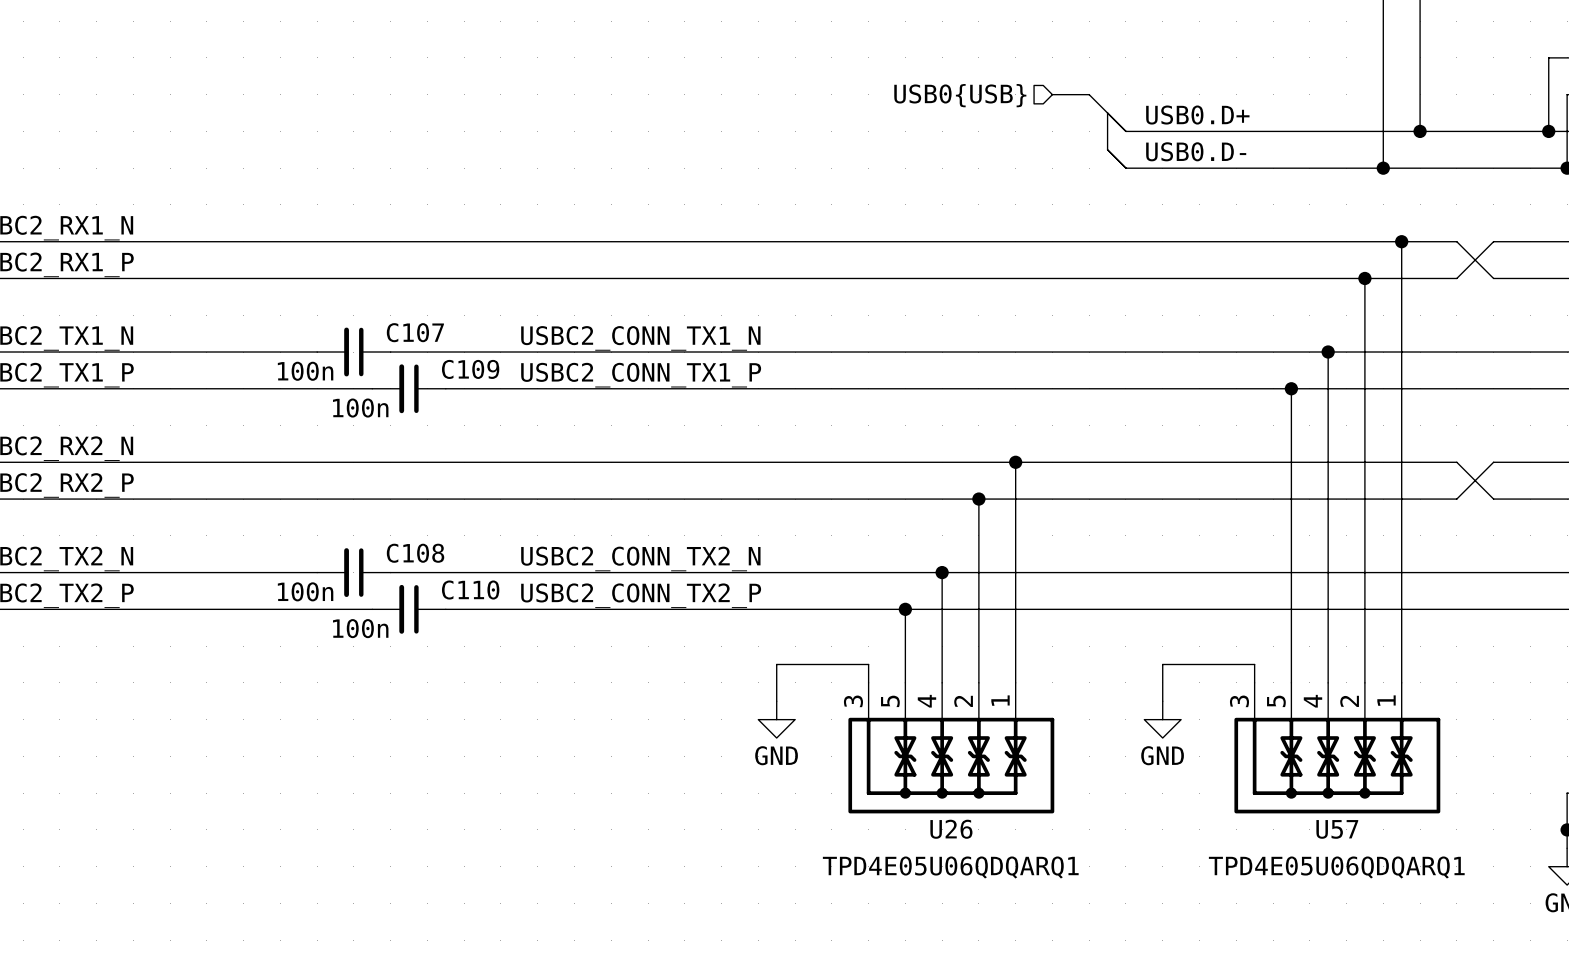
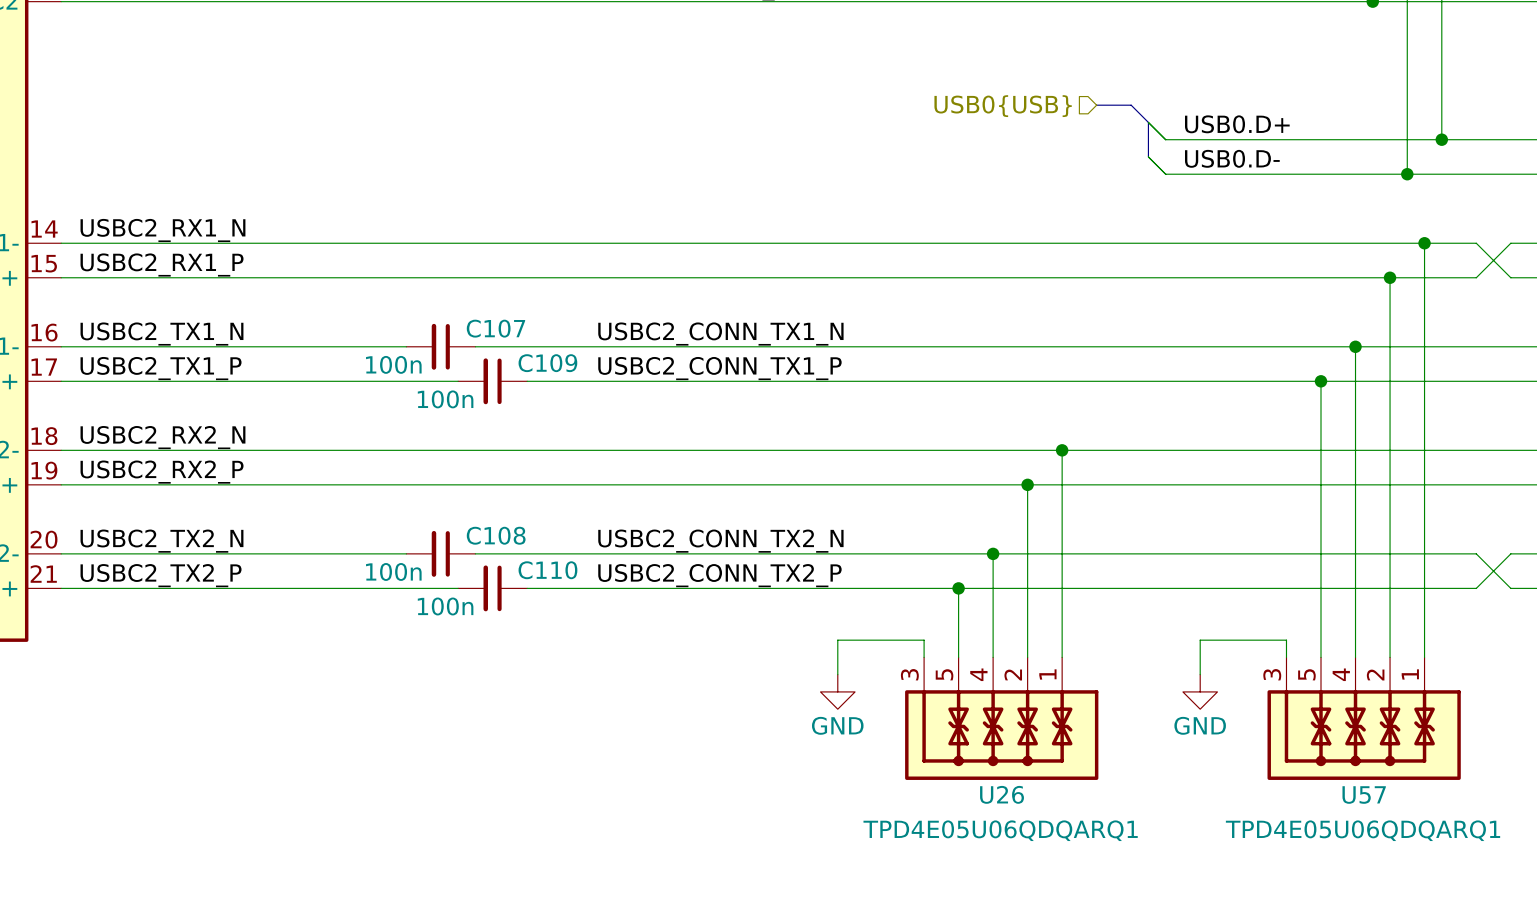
wire: (1456, 462) (1493, 499) -> (1476, 450) (1510, 450)
wire: (1493, 462) (1456, 499) -> (1510, 484) (1476, 484)
wire: (1456, 572) (1493, 572) -> (1476, 553) (1510, 588)
wire: (1456, 609) (1493, 609) -> (1476, 588) (1510, 553)

